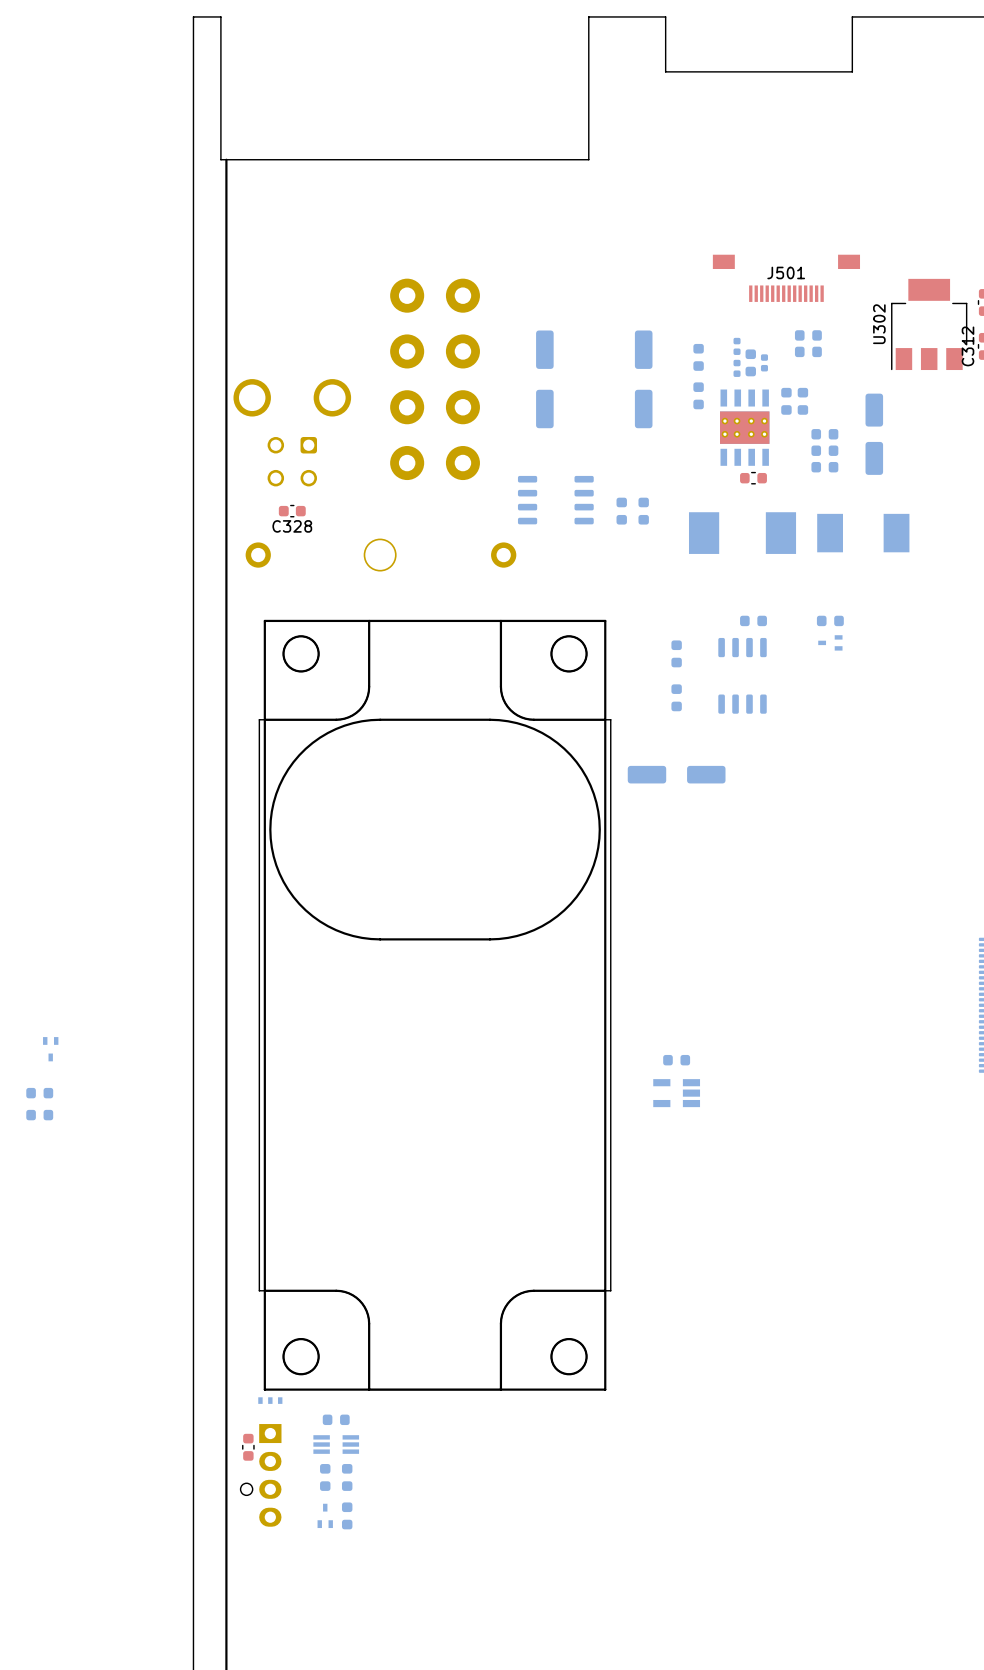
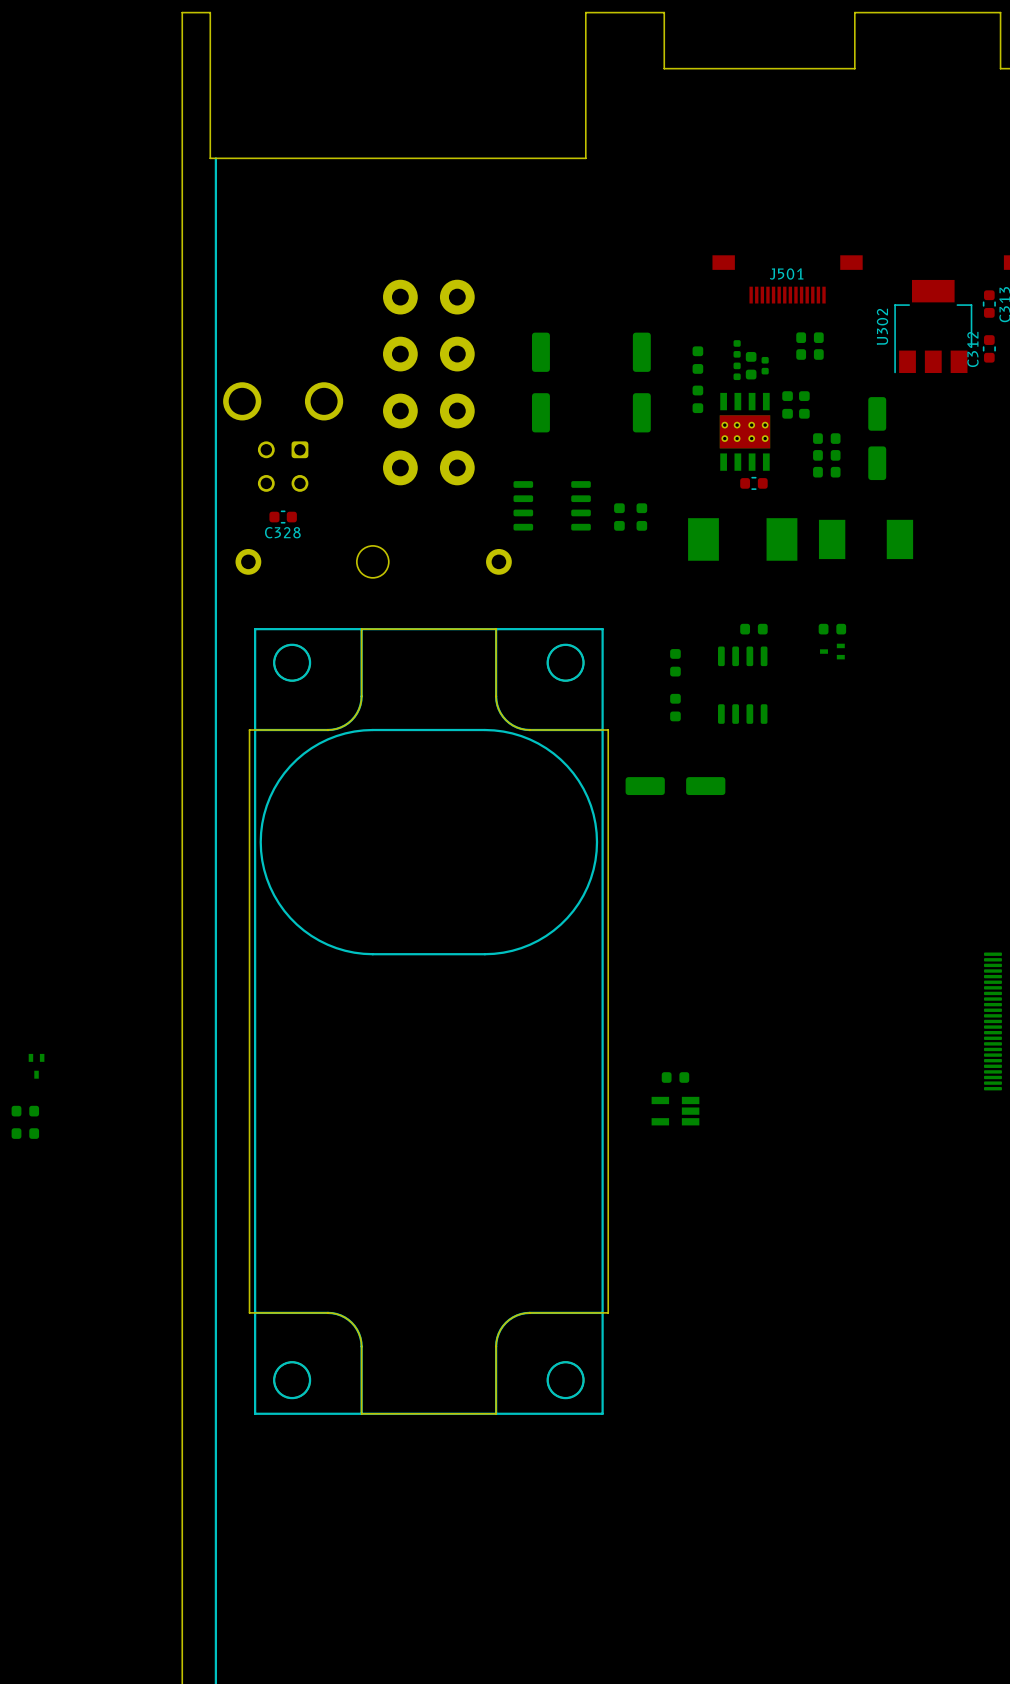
part: (270, 1400) -> none
part: (336, 1419) -> none
part: (336, 1444) -> none
part: (248, 1447) -> none
part: (261, 1475) -> none
part: (325, 1477) -> none
part: (347, 1477) -> none
part: (325, 1515) -> none
part: (347, 1515) -> none

